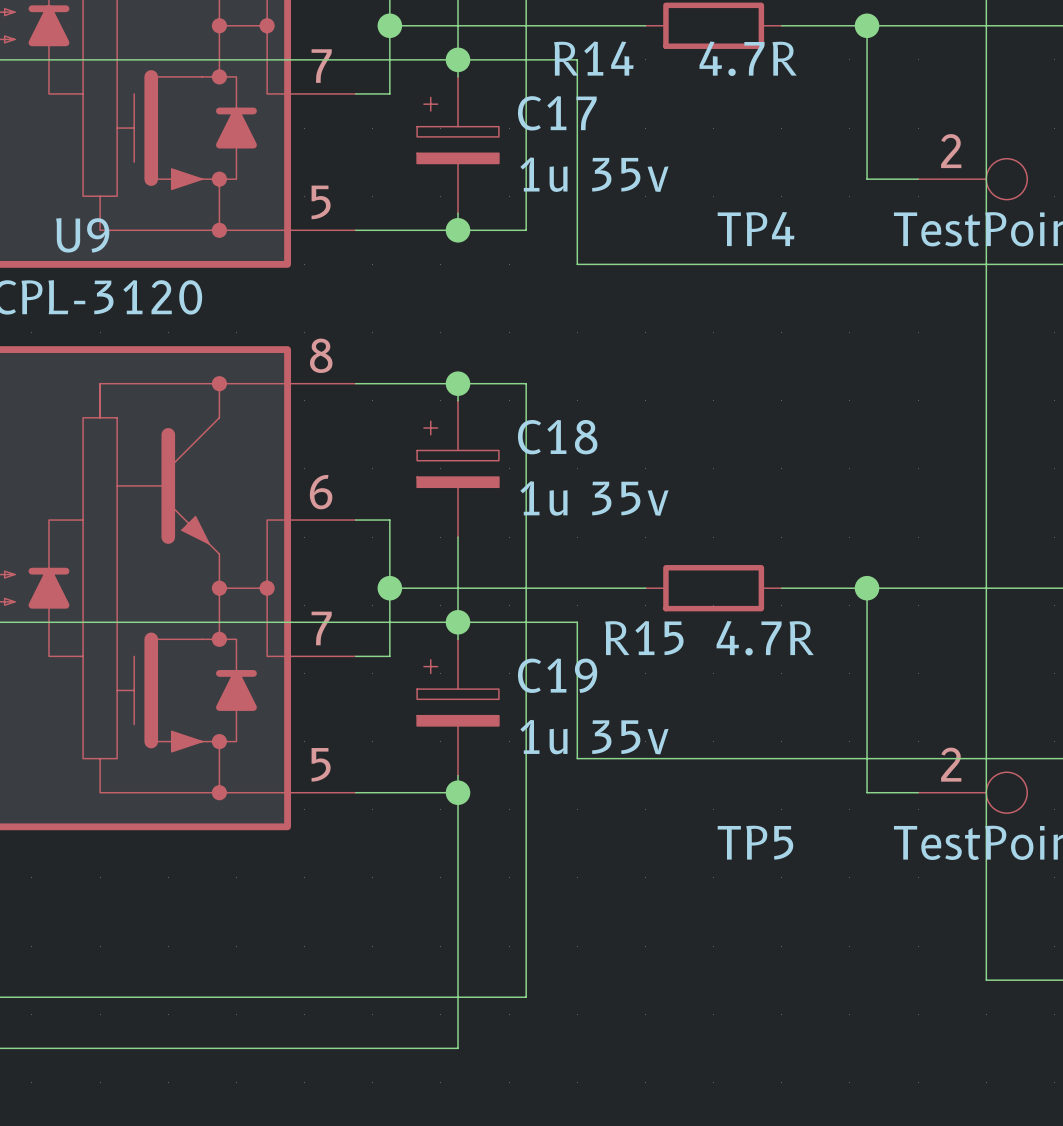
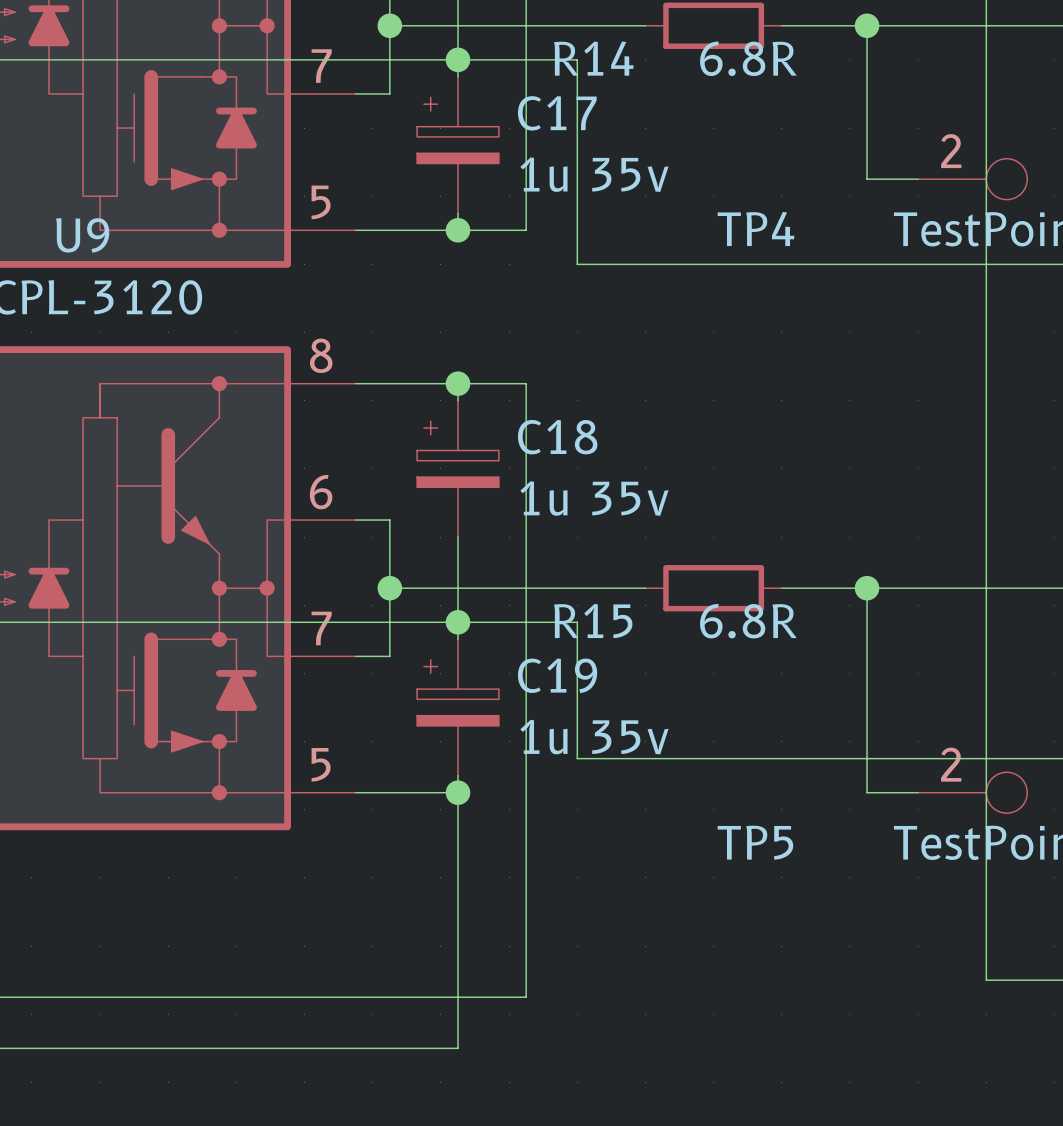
R14 value: 4.7R (748, 58) -> 6.8R (748, 58)
R15 name position: R15 (644, 638) -> R15 (593, 621)
R15 value: 4.7R (765, 638) -> 6.8R (748, 621)

